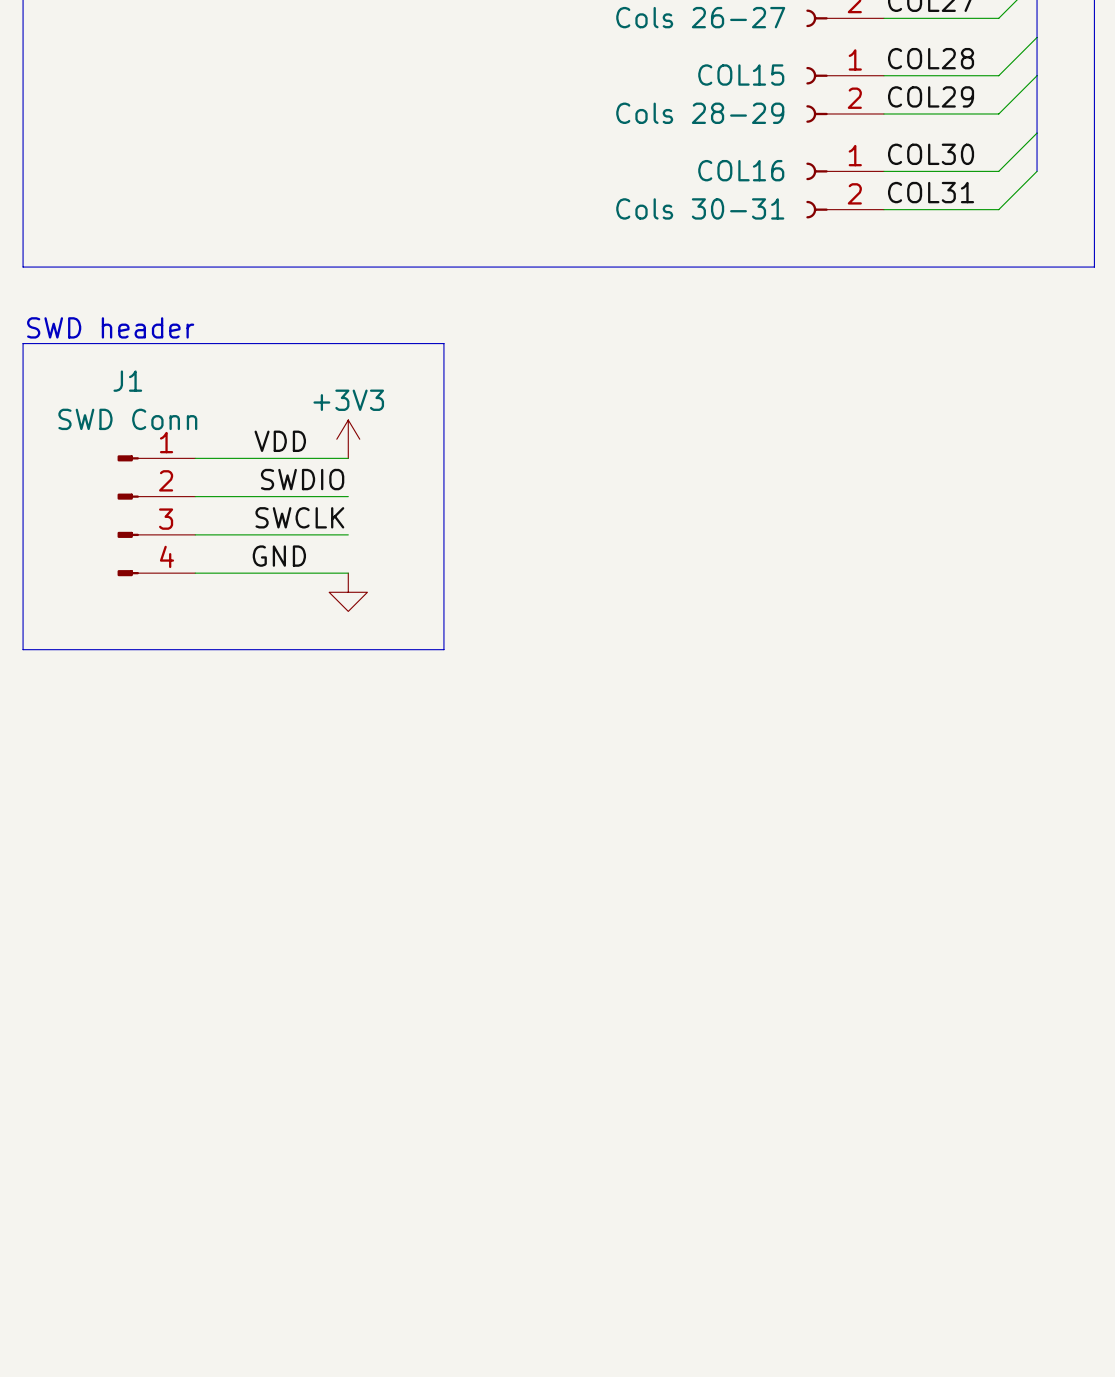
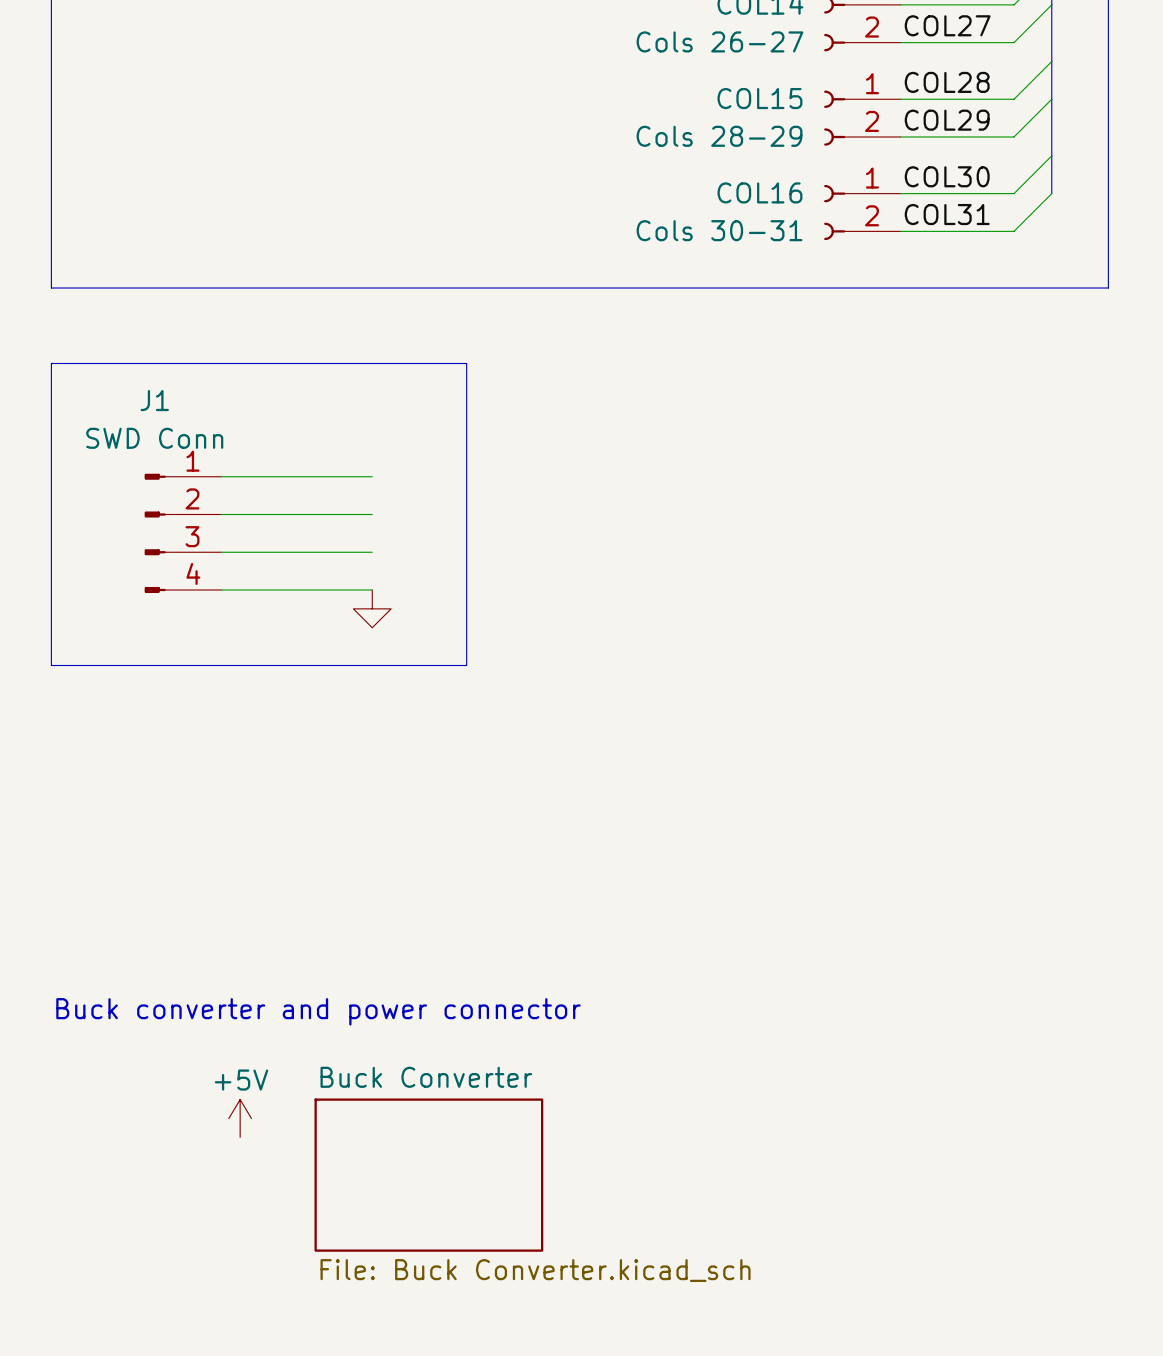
text: SWD header (110, 327) -> none
power symbol: +3V3 (348, 439) -> none
label: VDD (280, 441) -> none
label: SWDIO (302, 479) -> none
label: SWCLK (299, 517) -> none
label: GND (279, 556) -> none
text: none -> Buck converter and power connector (318, 1011)
power symbol: none -> +5V (240, 1118)
sheet Buck Converter: none -> File: Buck Converter.kicad_sch (428, 1175)

